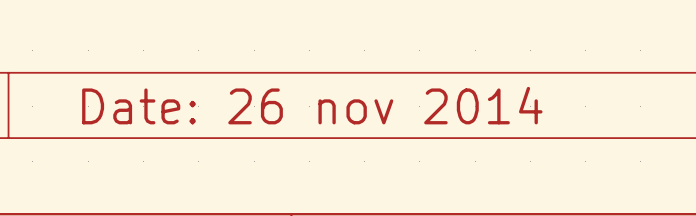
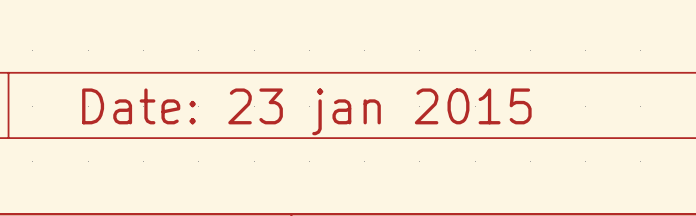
title block: Date: 26 nov 2014 (312, 105) -> Date: 23 jan 2015 (306, 111)

